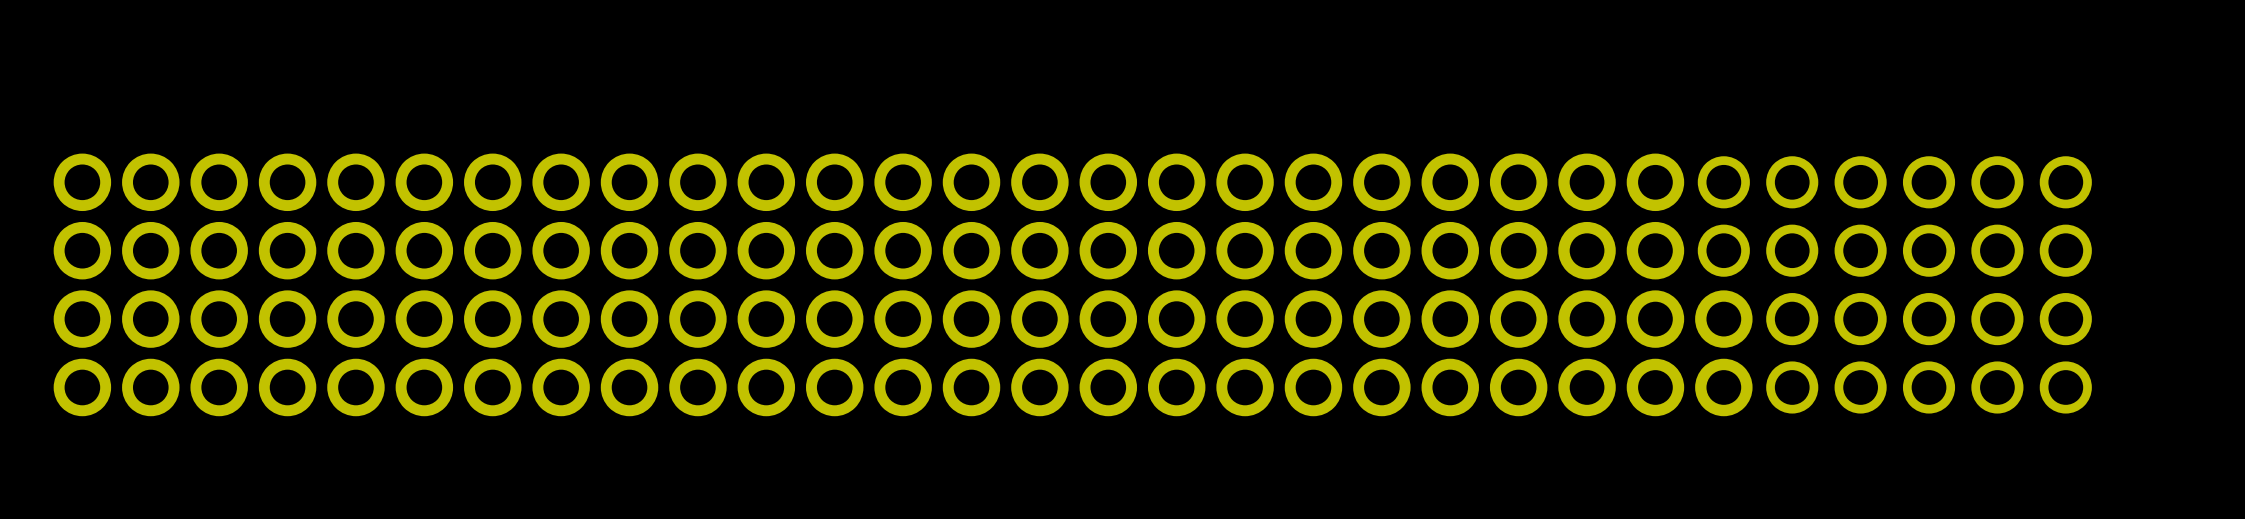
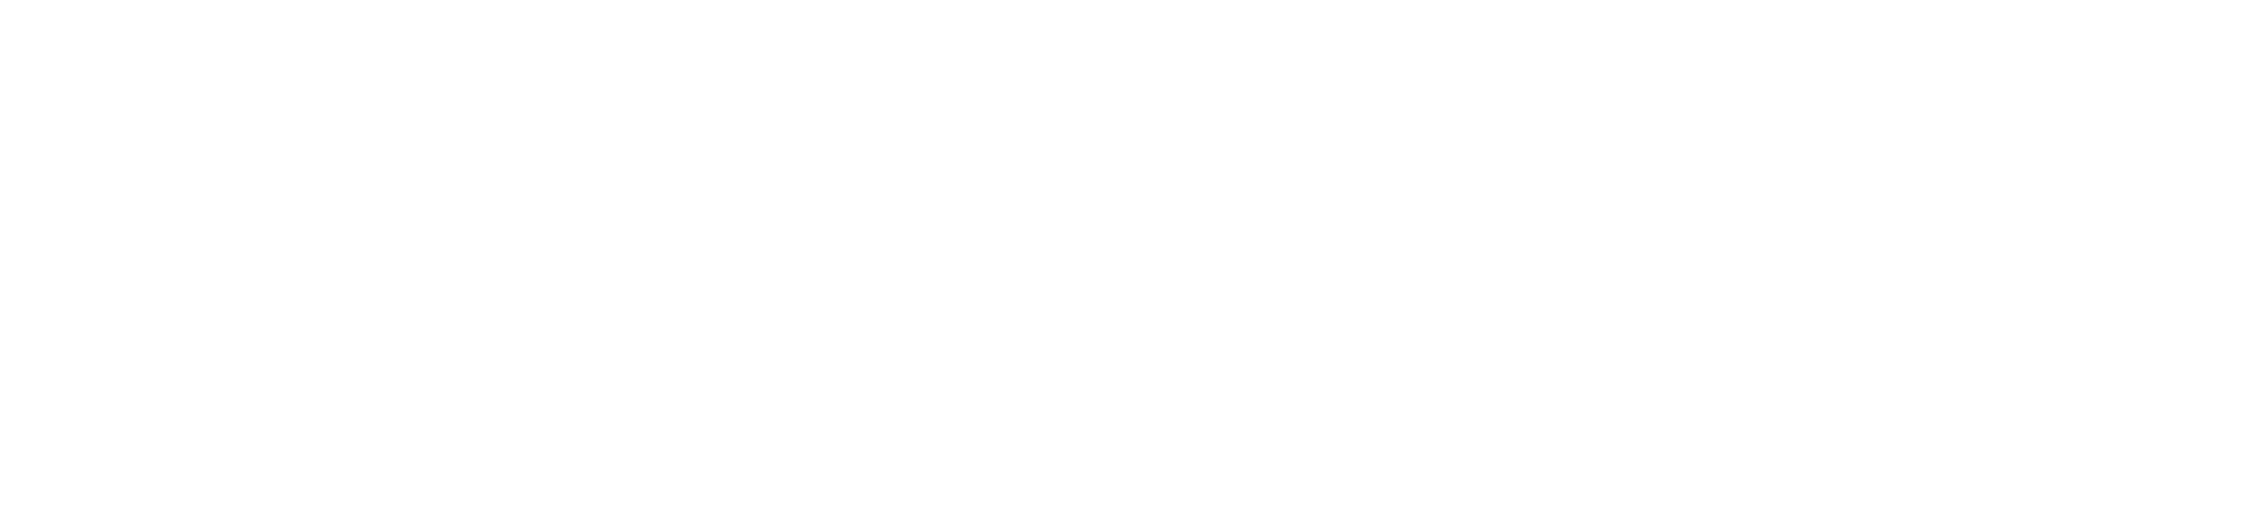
part: (1072, 284) -> none

